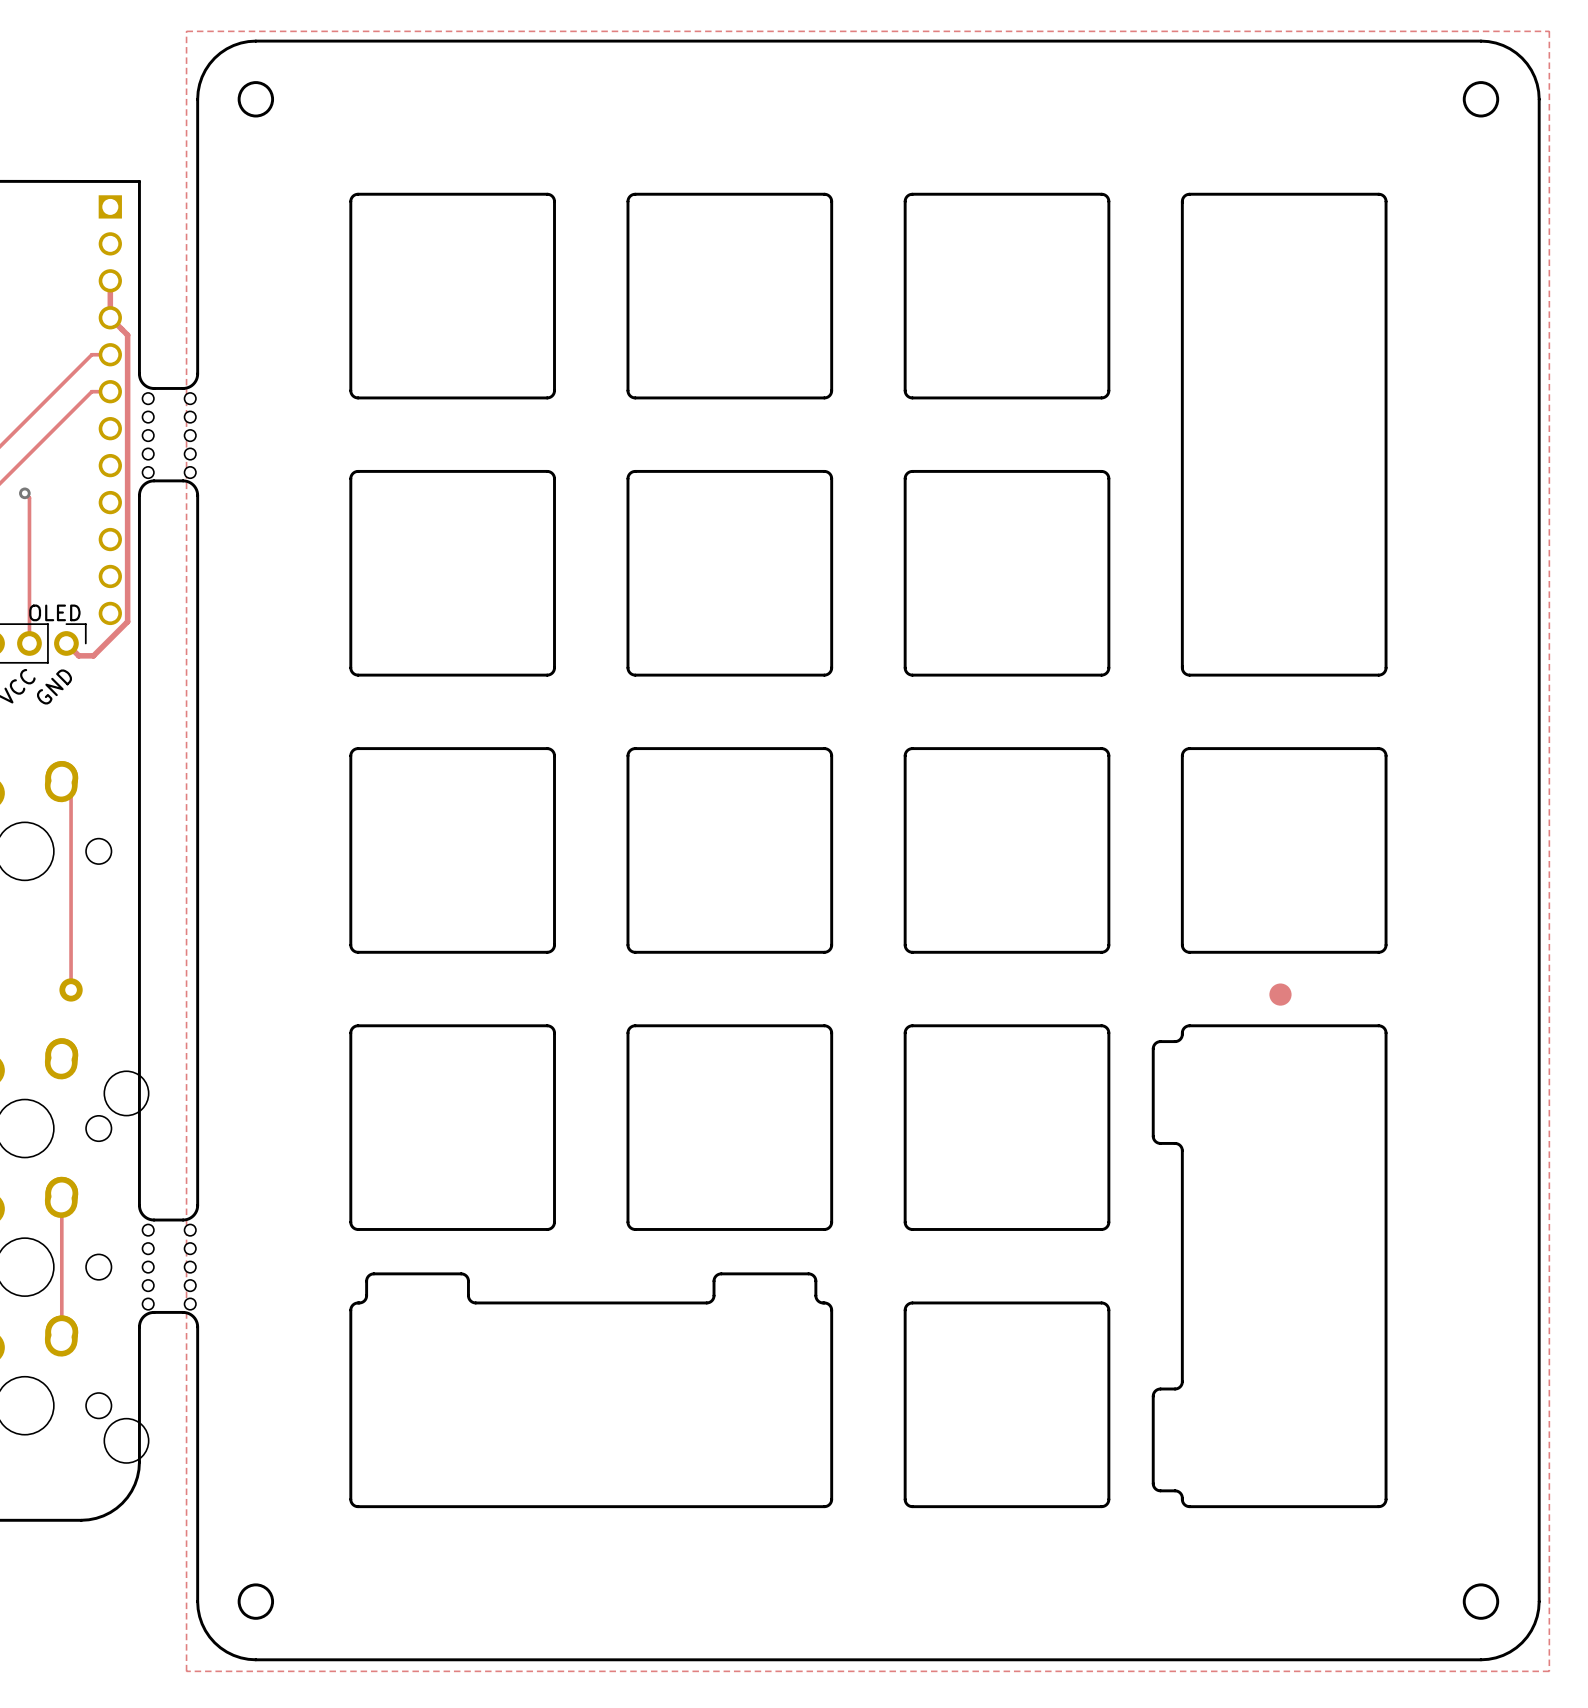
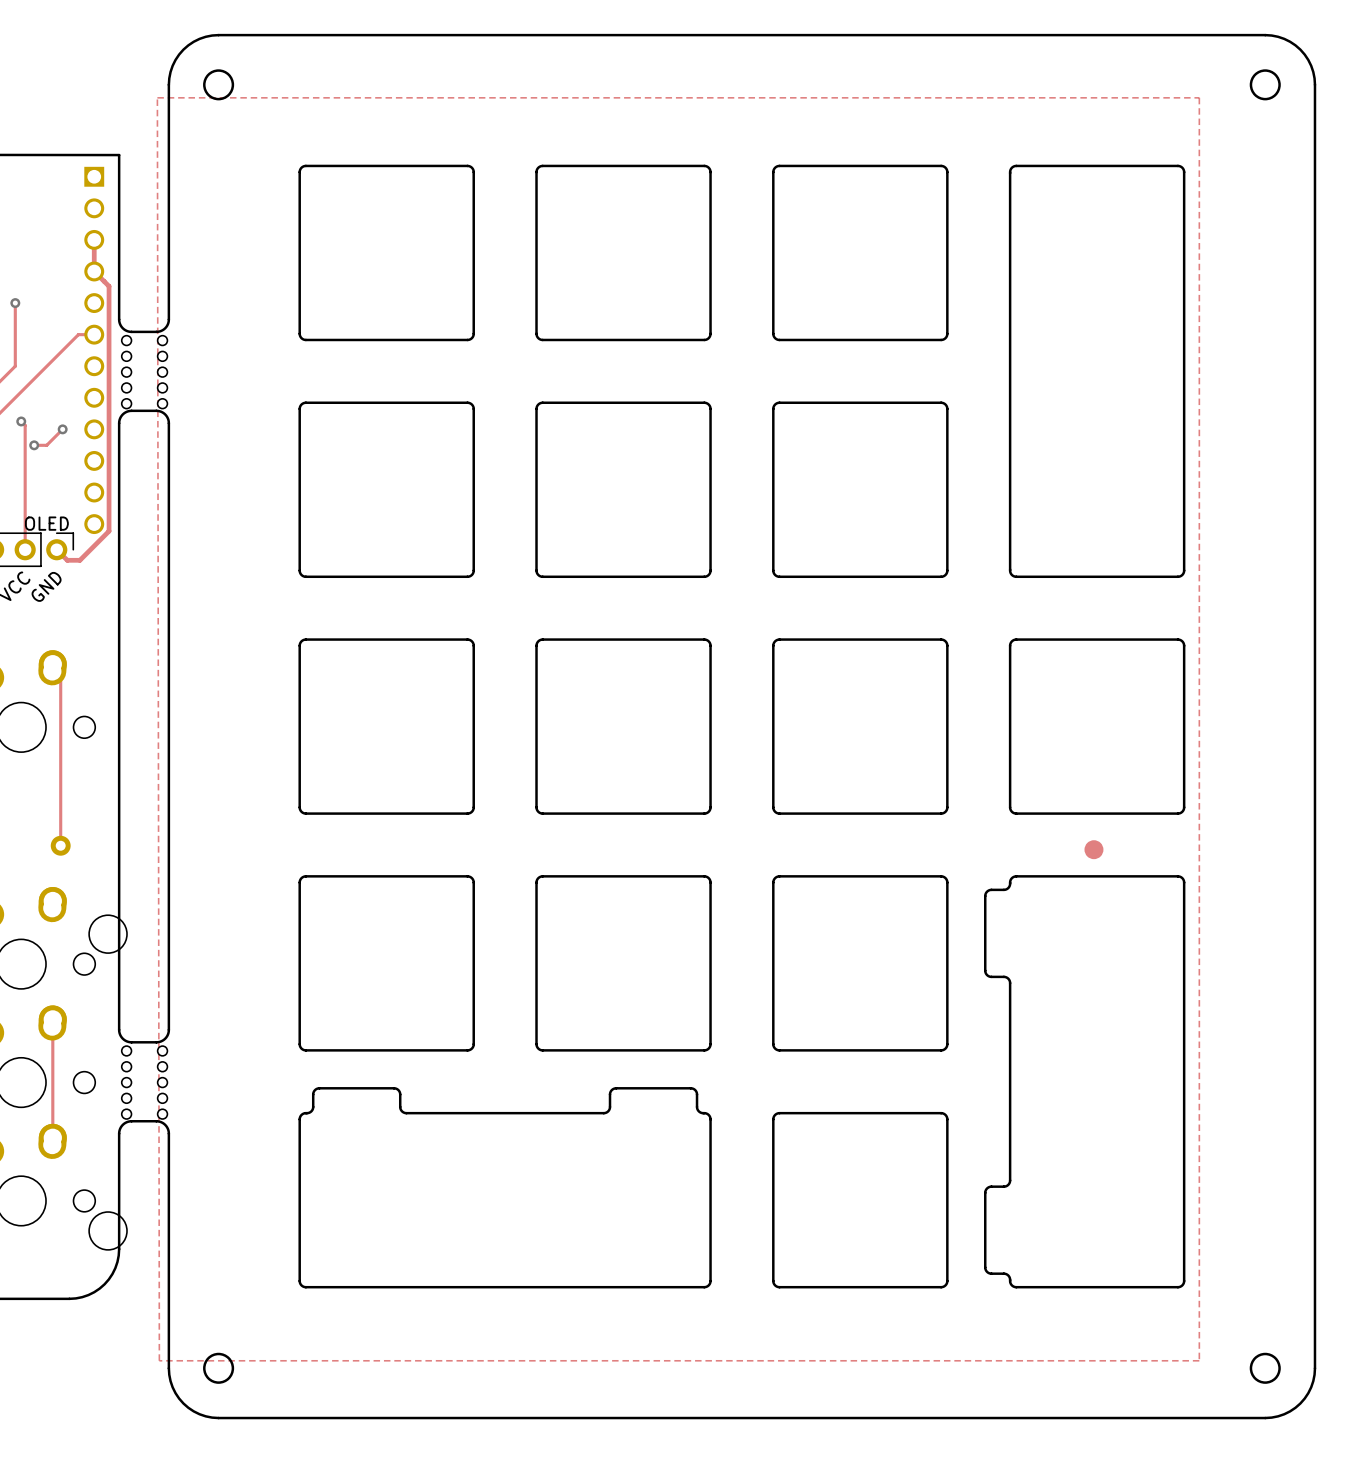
zone outline: (186, 31) (1549, 31) (1549, 1671) (186, 1671) (186, 31) -> (157, 97) (159, 1360) (1199, 1360) (1199, 97) (157, 97)
via: none -> (15, 303)
track: (110, 354) (91, 354) (17, 428) -> (15, 303) (15, 366)
track: none -> (62, 429) (46, 445) (34, 445)
via: none -> (62, 429)
via: none -> (34, 445)

